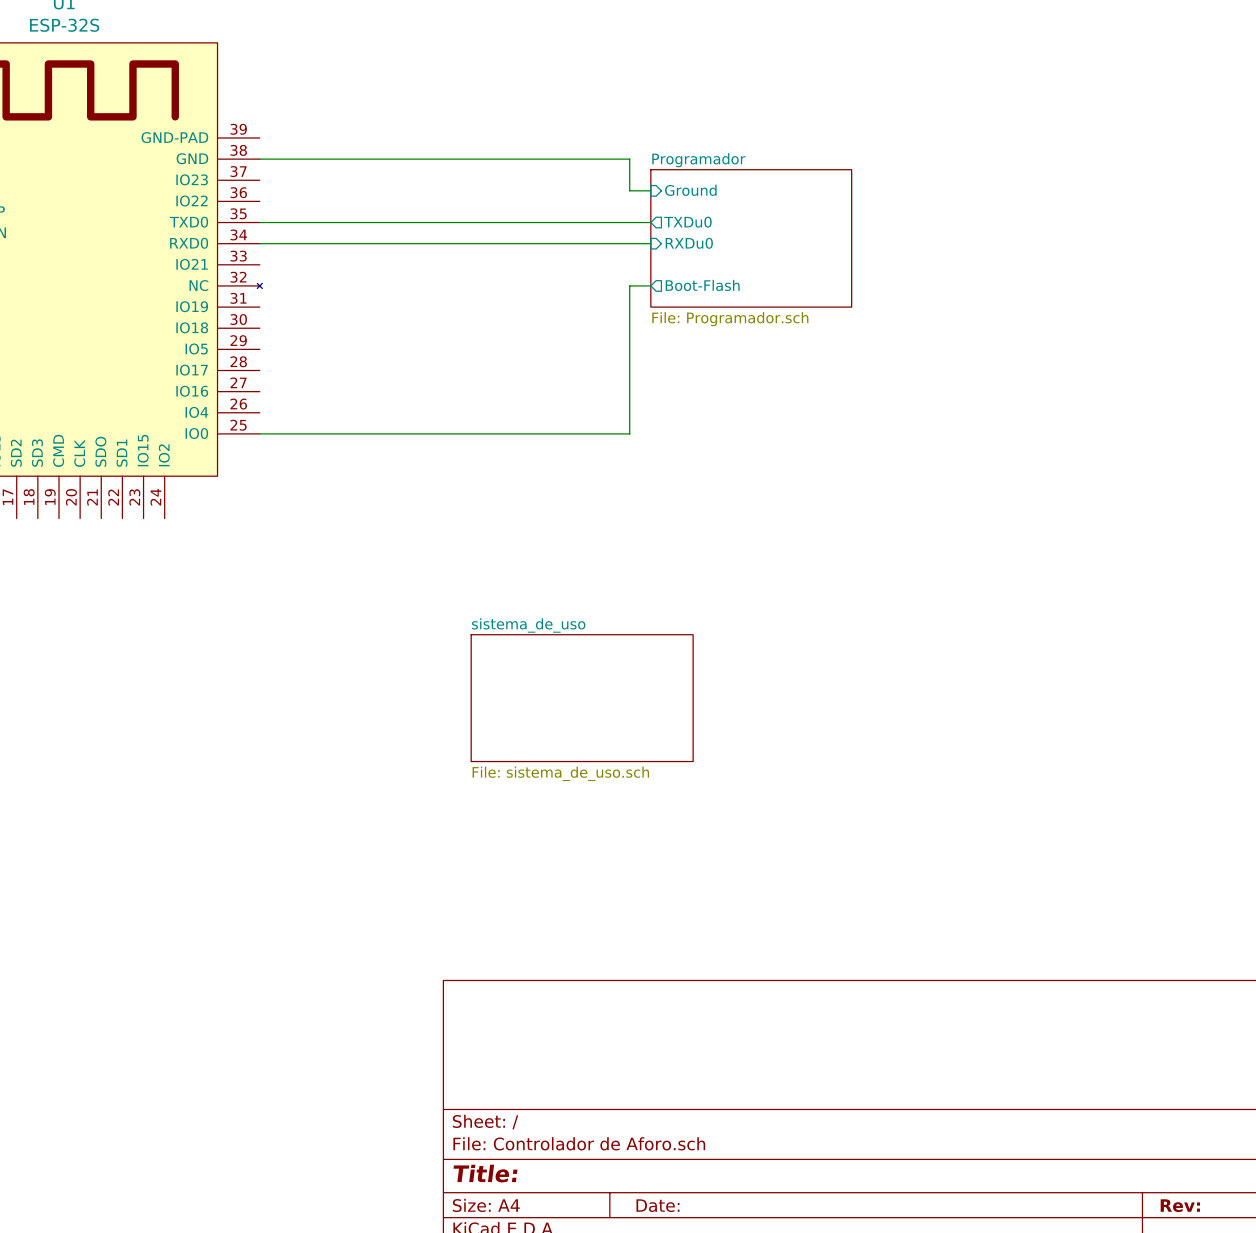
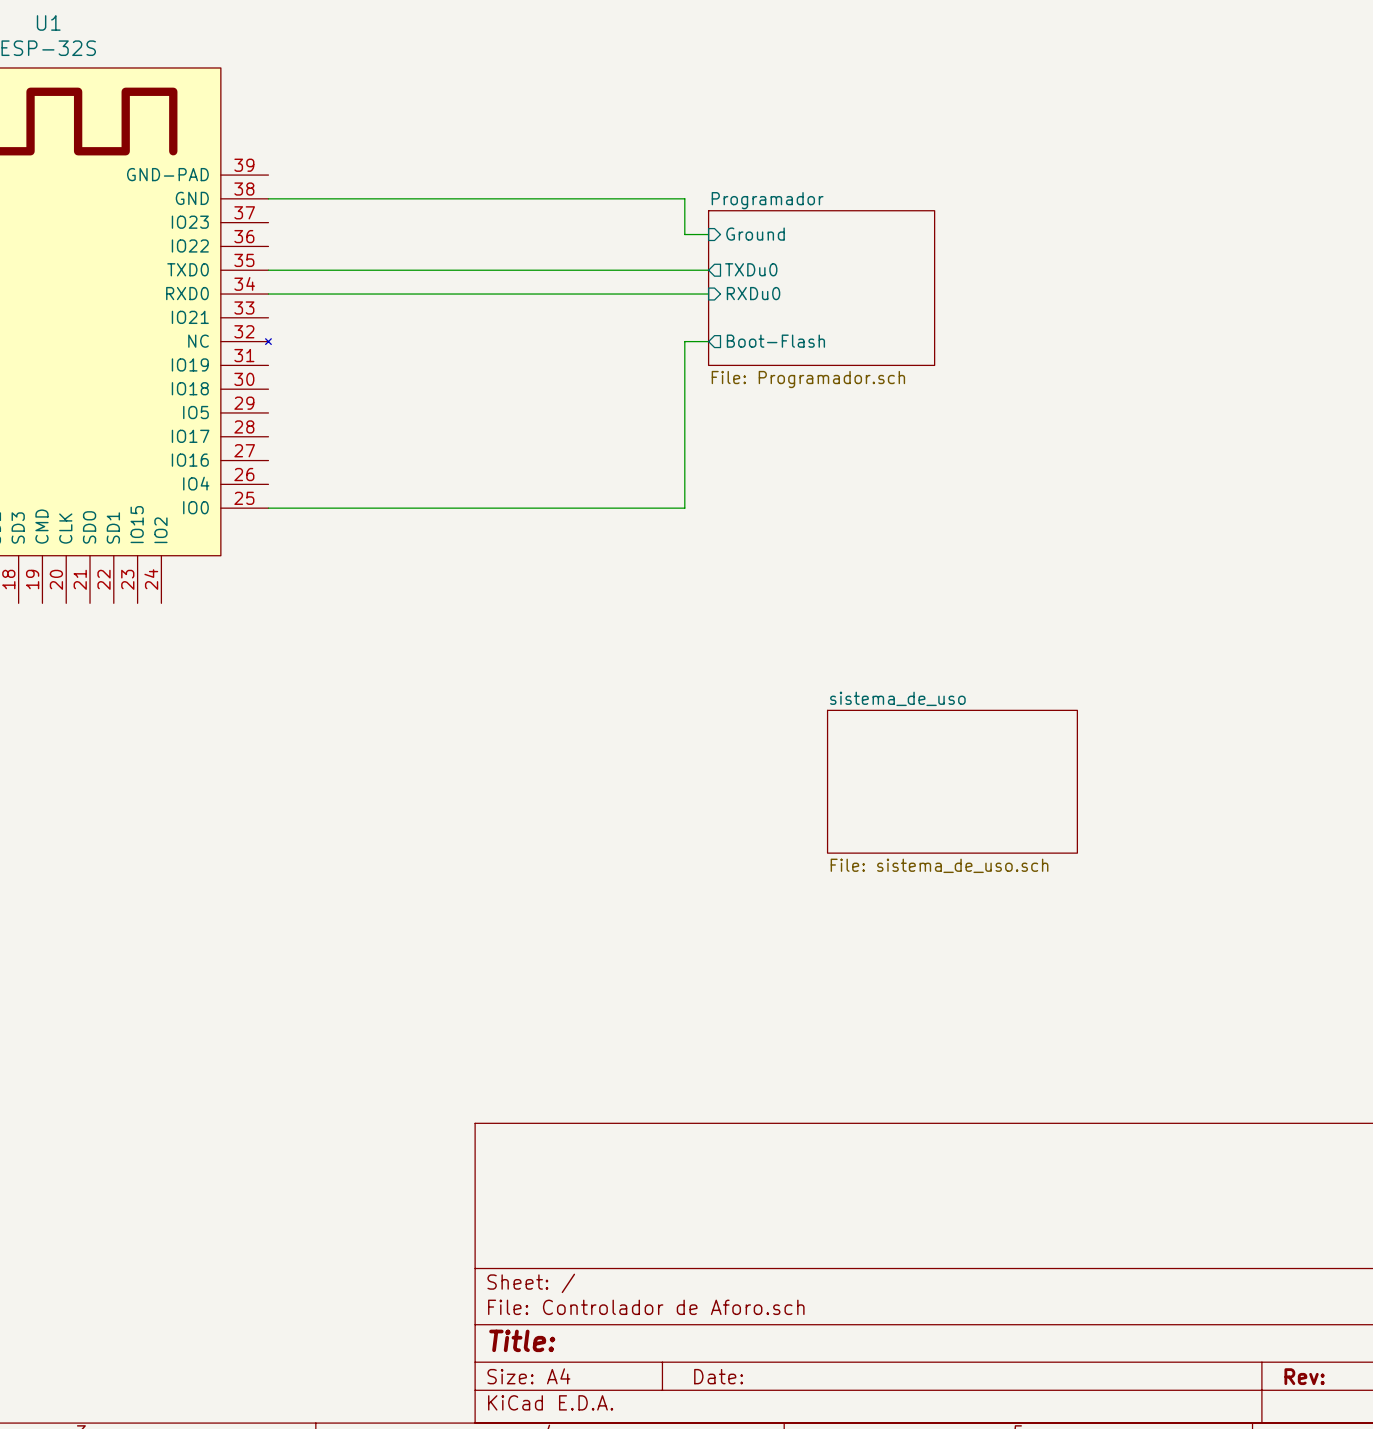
sheet sistema_de_uso: none -> File: sistema_de_uso.sch (952, 781)
sheet sistema_de_uso: File: sistema_de_uso.sch (582, 698) -> none

